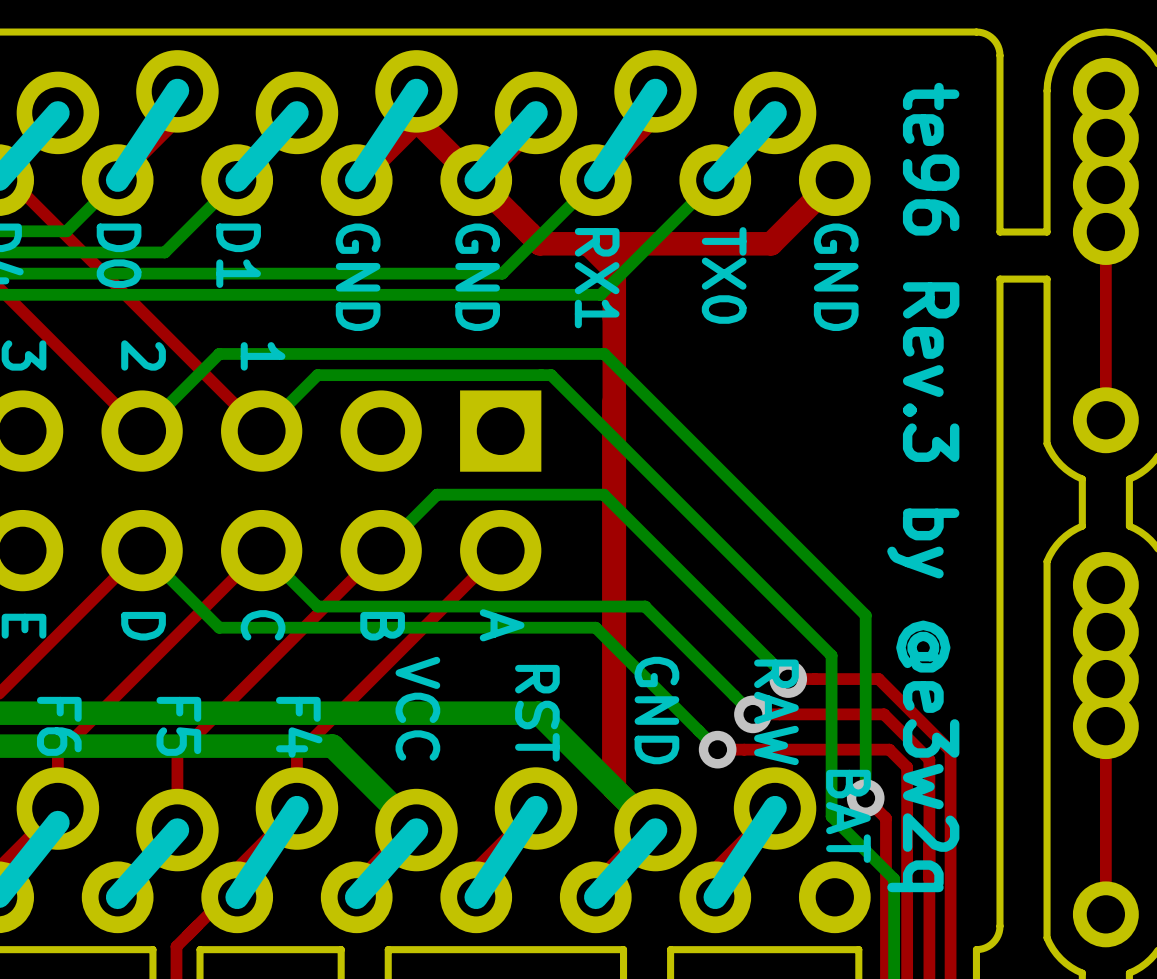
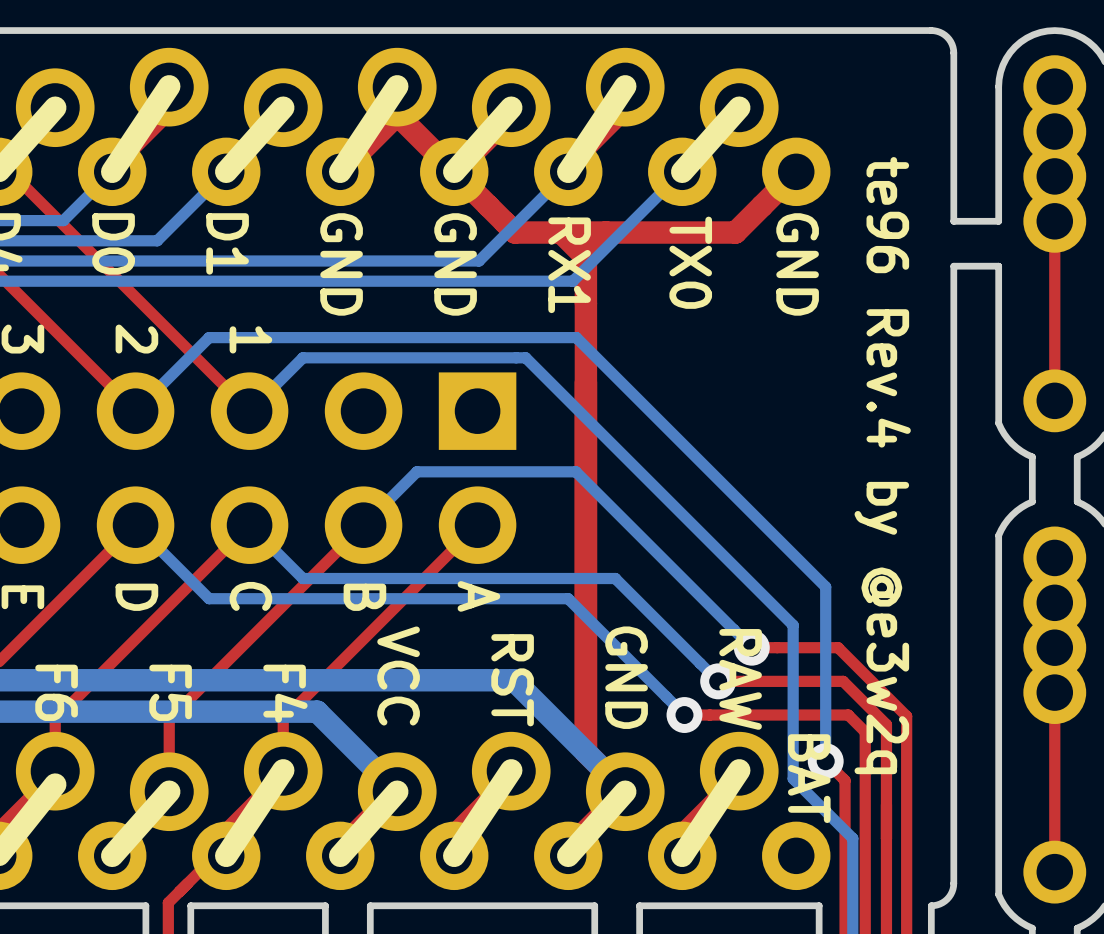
text: te96 Rev.3 by @e3w2q (923, 487) -> te96 Rev.4 by @e3w2q (882, 465)

